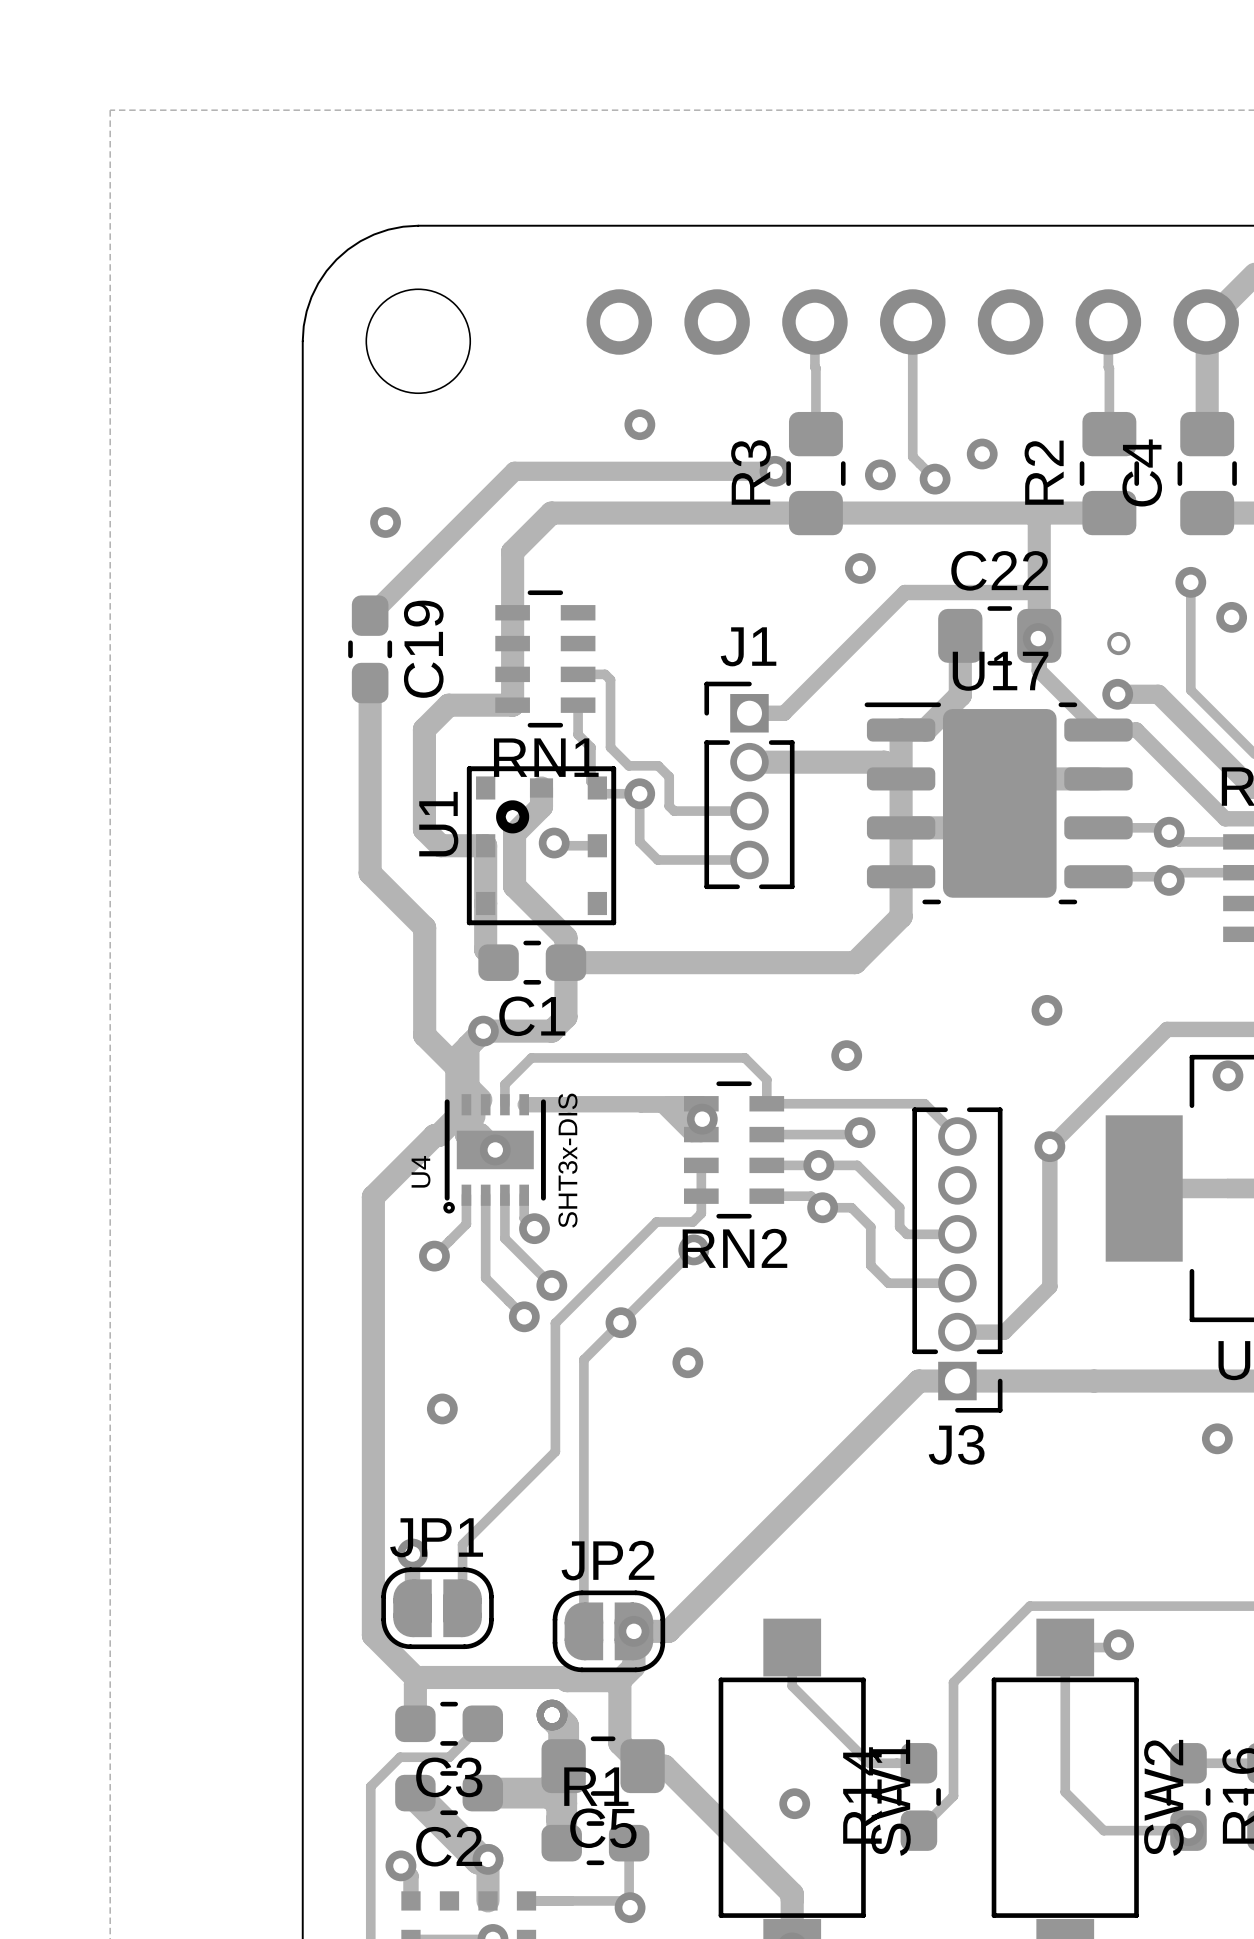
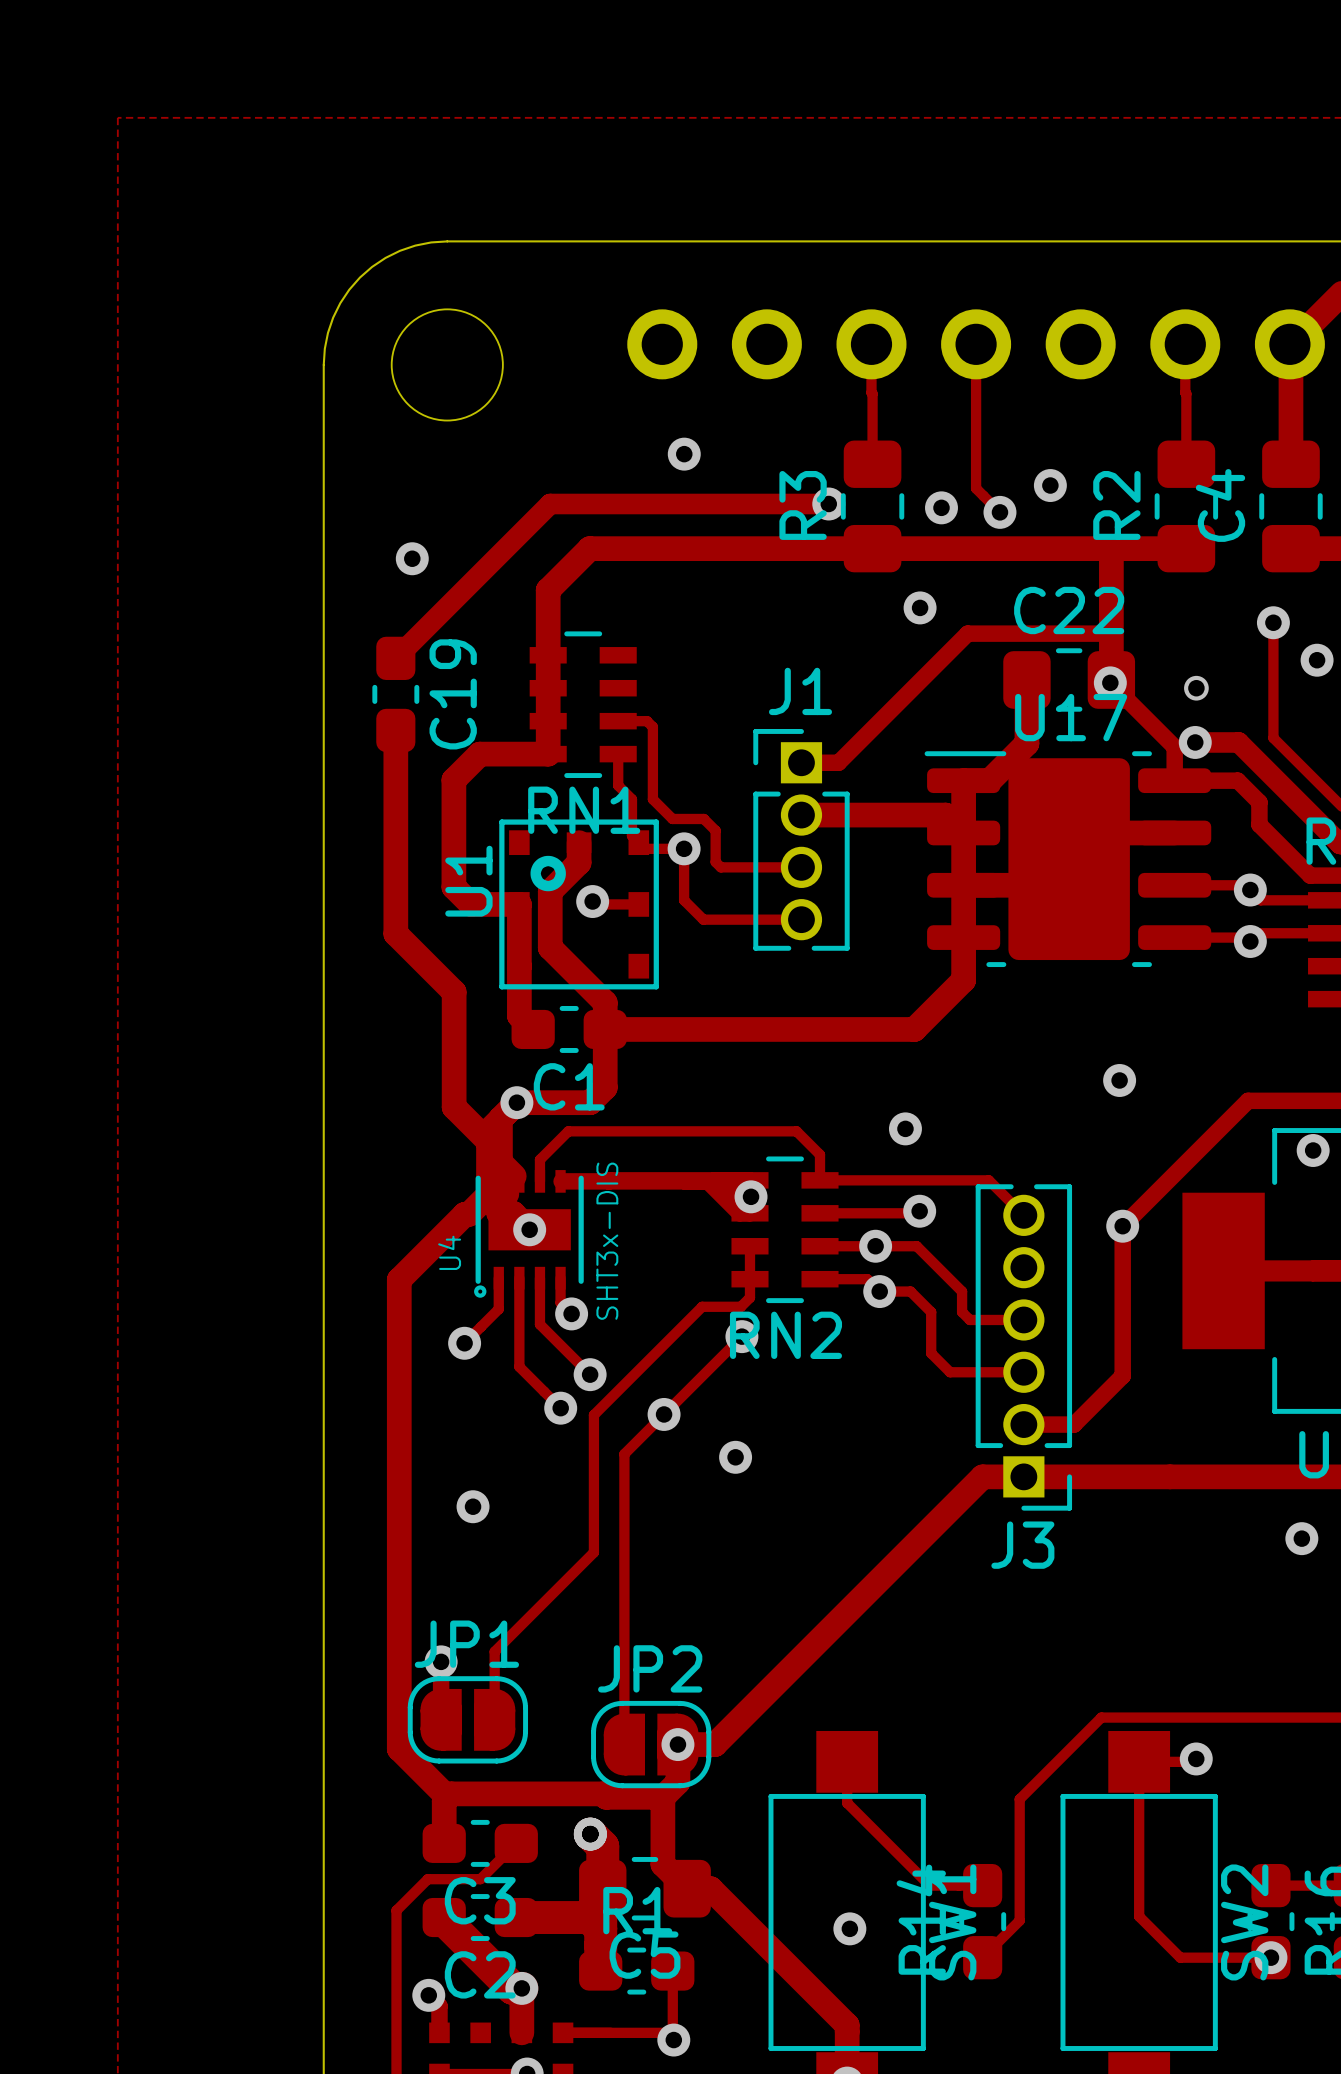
track: (1039, 635) (1039, 670) (1098, 730) -> (1110, 682) (1174, 747) (1174, 780)
track: (1136, 730) (1177, 771) -> (1215, 780) (1237, 780) (1259, 802) (1259, 824)

